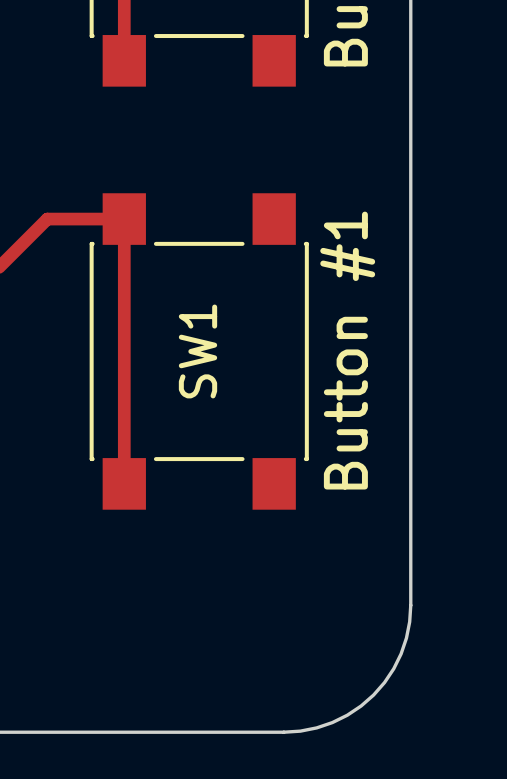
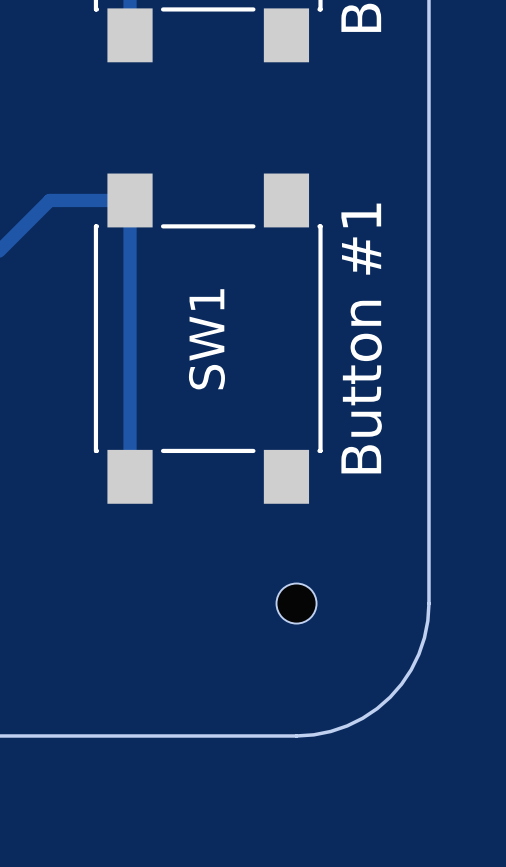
part: none -> (296, 603)

